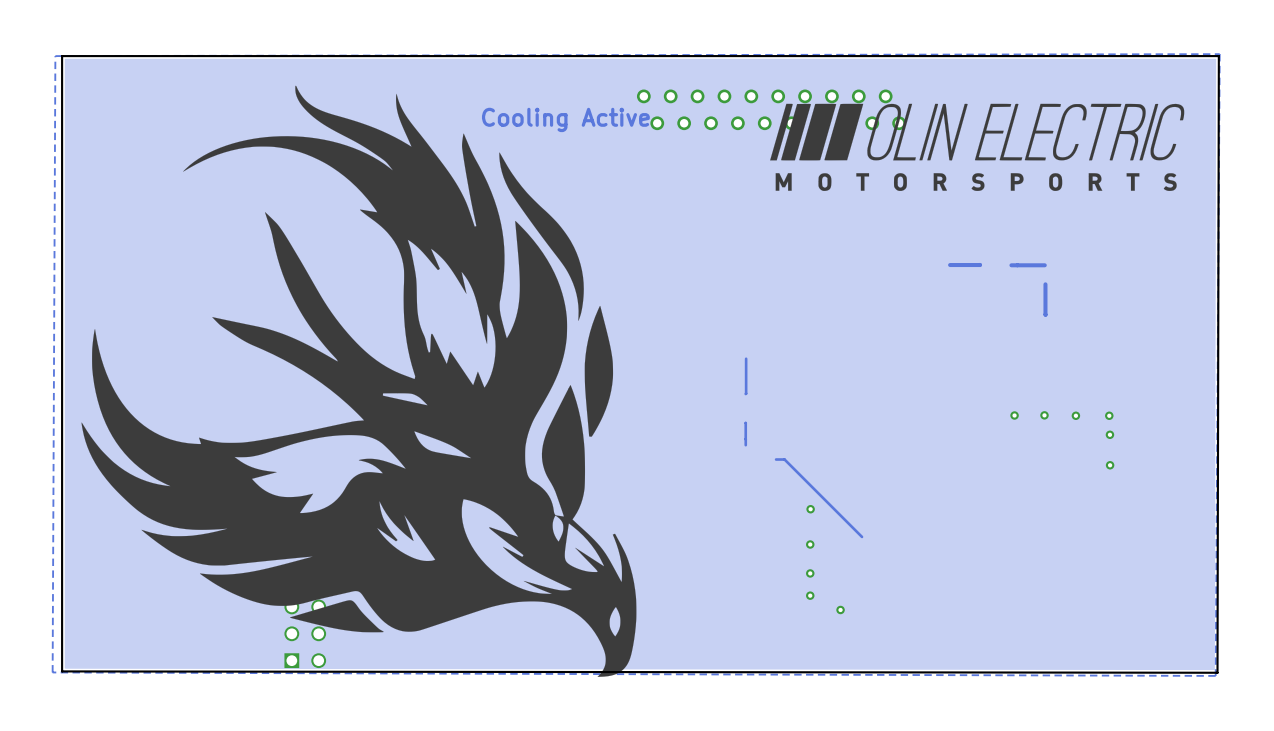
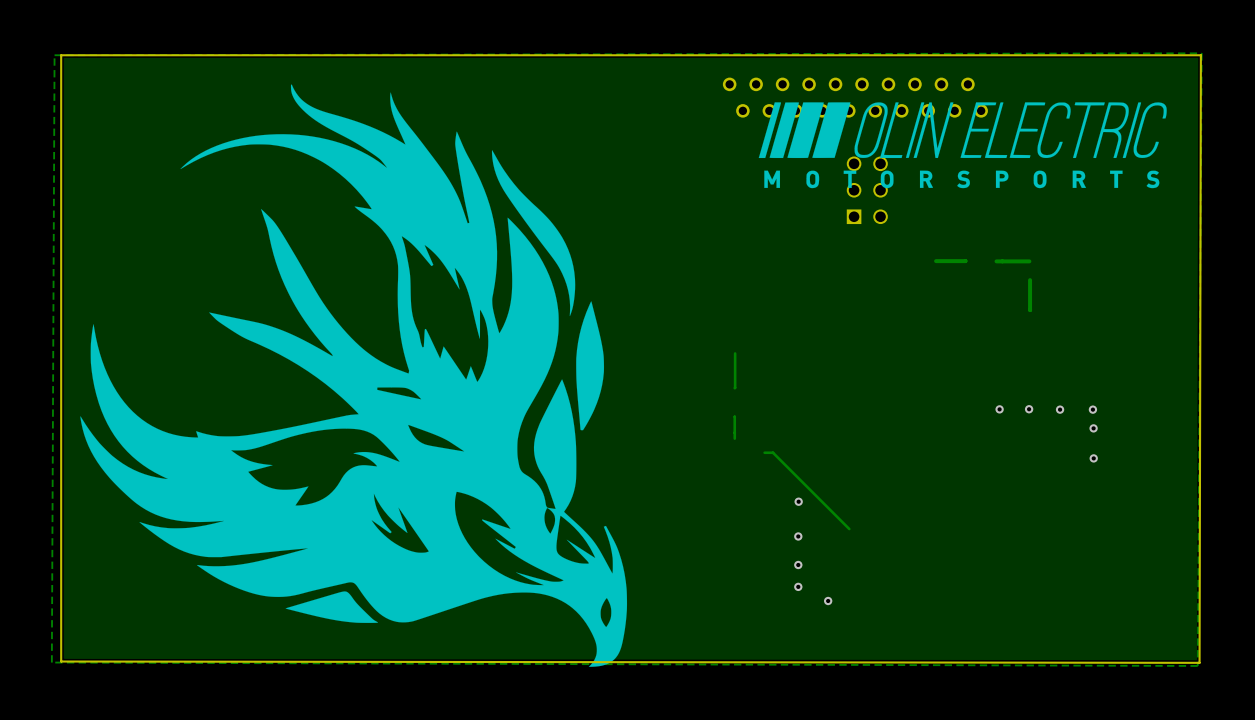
part position: (771, 109) -> (855, 97)
text: Cooling Active (565, 119) -> none
part: none -> (867, 190)
part: (305, 633) -> none

